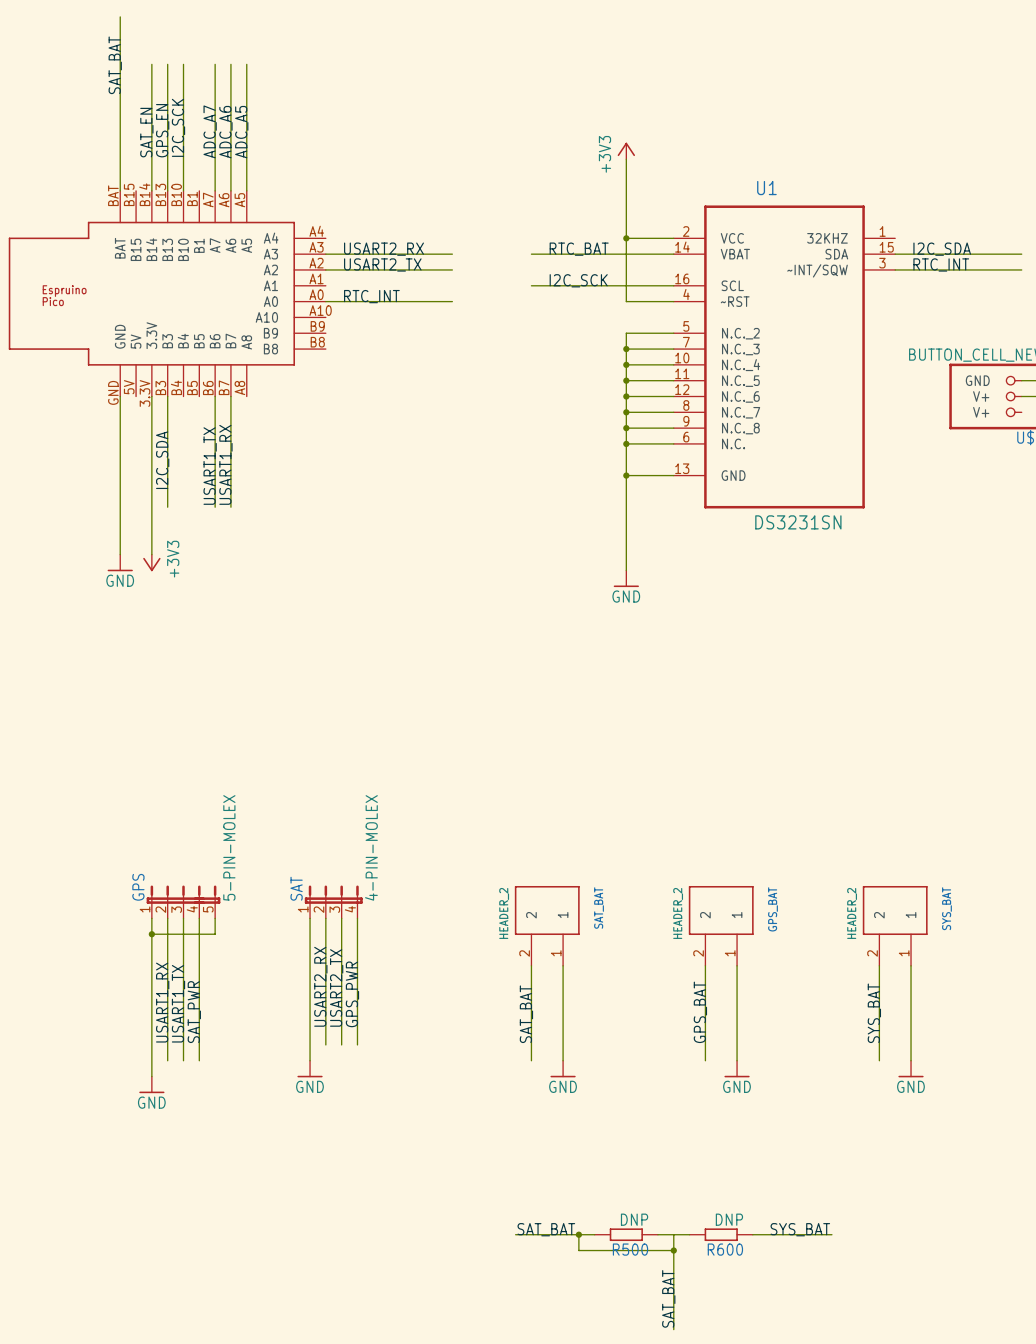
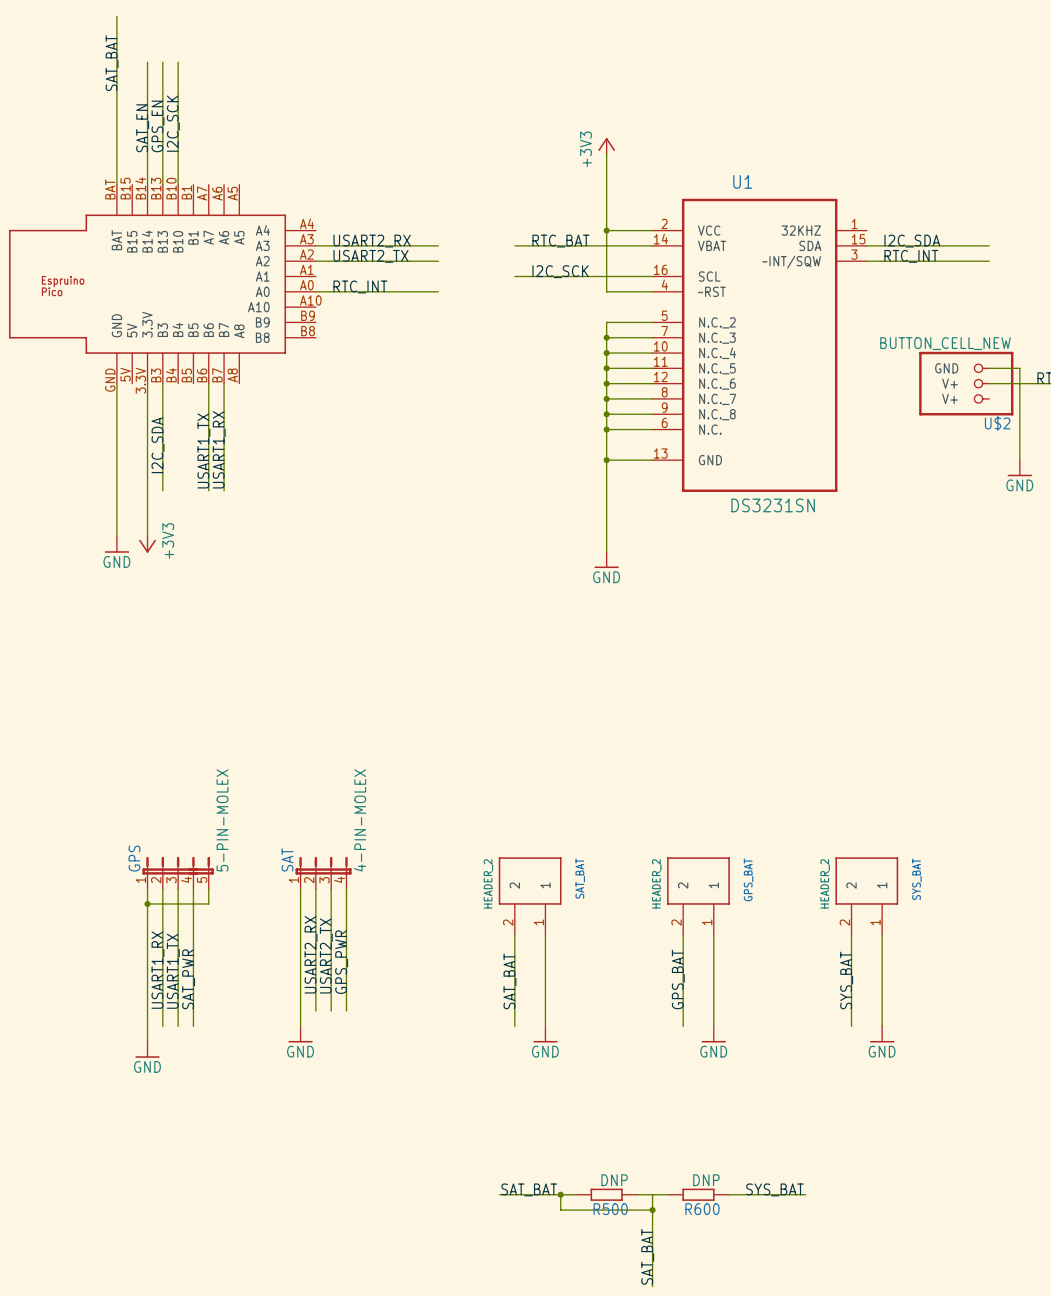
wire: (215, 64) (215, 190) -> none
wire: (230, 64) (230, 190) -> none
wire: (246, 64) (246, 190) -> none
label: ADC_A7 (210, 131) -> none
label: ADC_A6 (225, 132) -> none
label: ADC_A5 (241, 132) -> none

